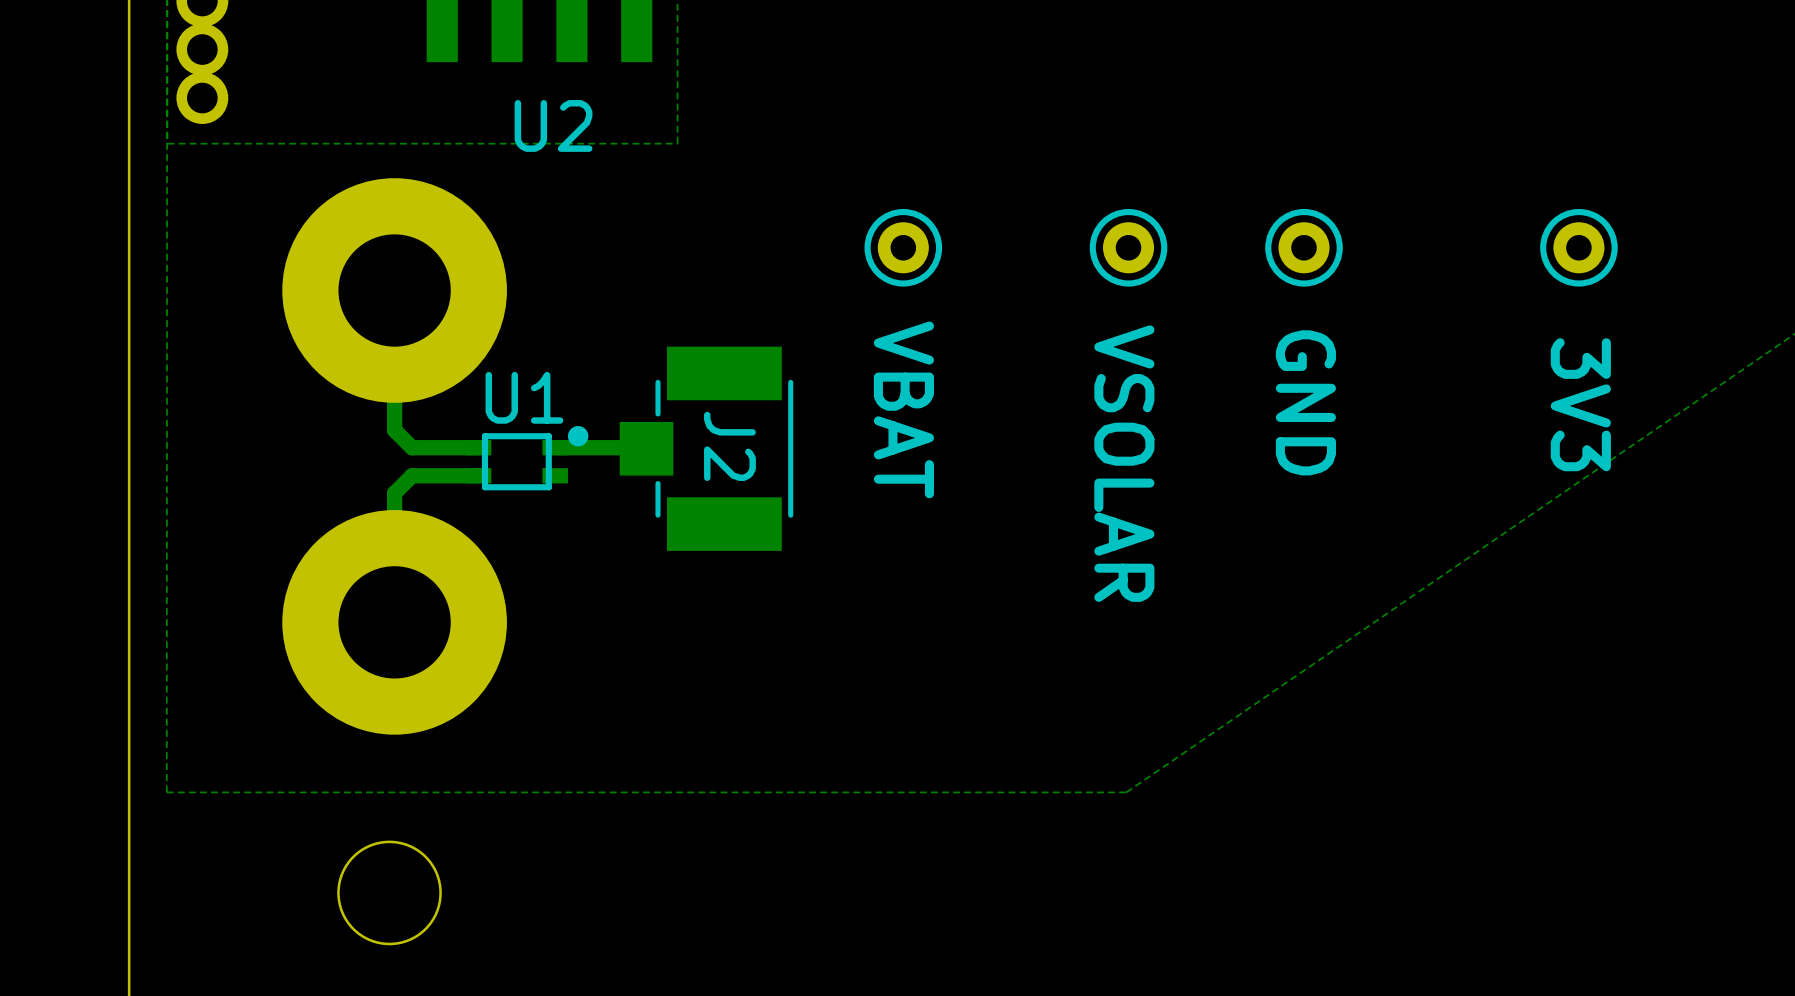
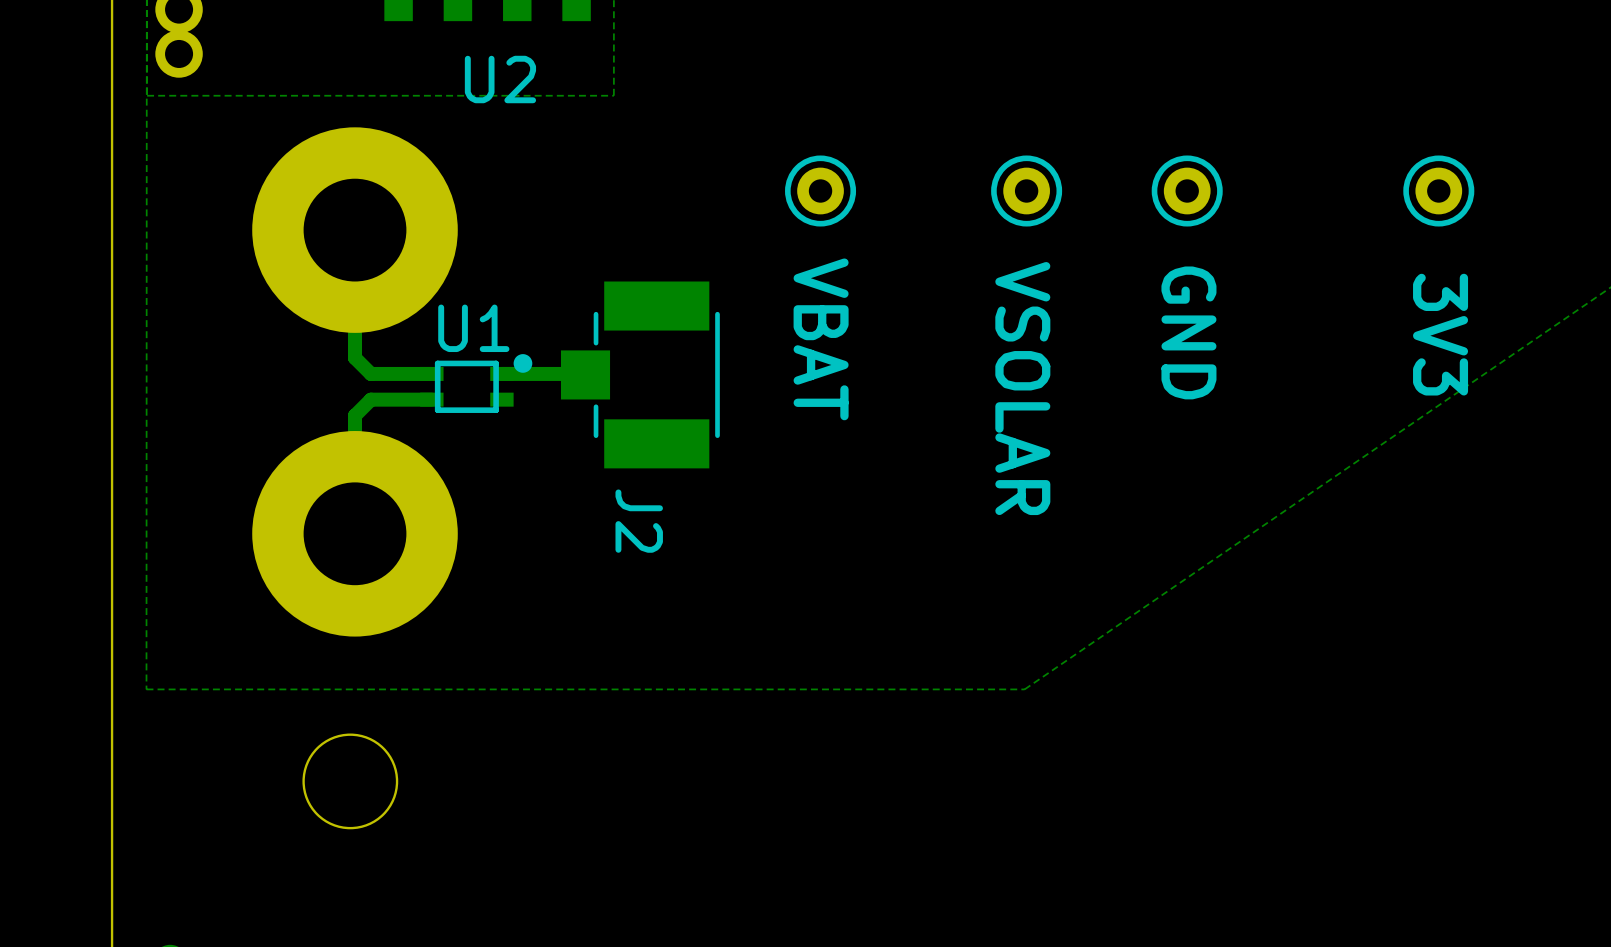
J2 name position: J2 (729, 446) -> J2 (639, 521)

